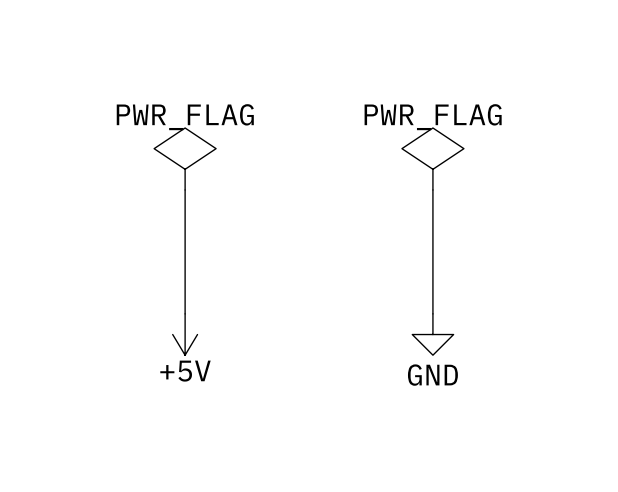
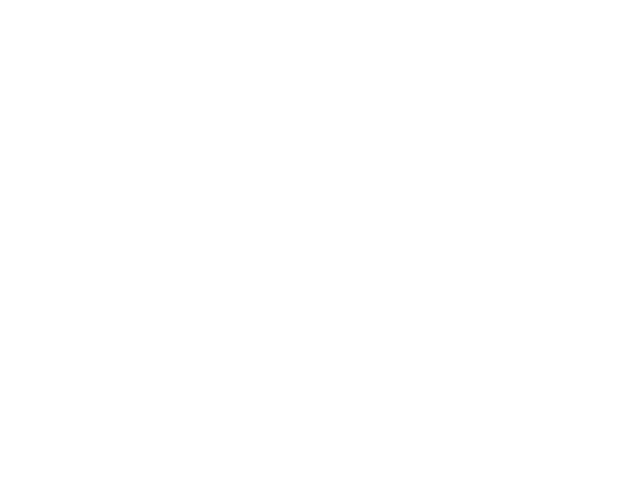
power symbol: PWR_FLAG (185, 158) -> none
power symbol: PWR_FLAG (432, 158) -> none
wire: (185, 189) (185, 313) -> none
wire: (432, 189) (432, 313) -> none
power symbol: +5V (185, 334) -> none
power symbol: GND (432, 334) -> none

